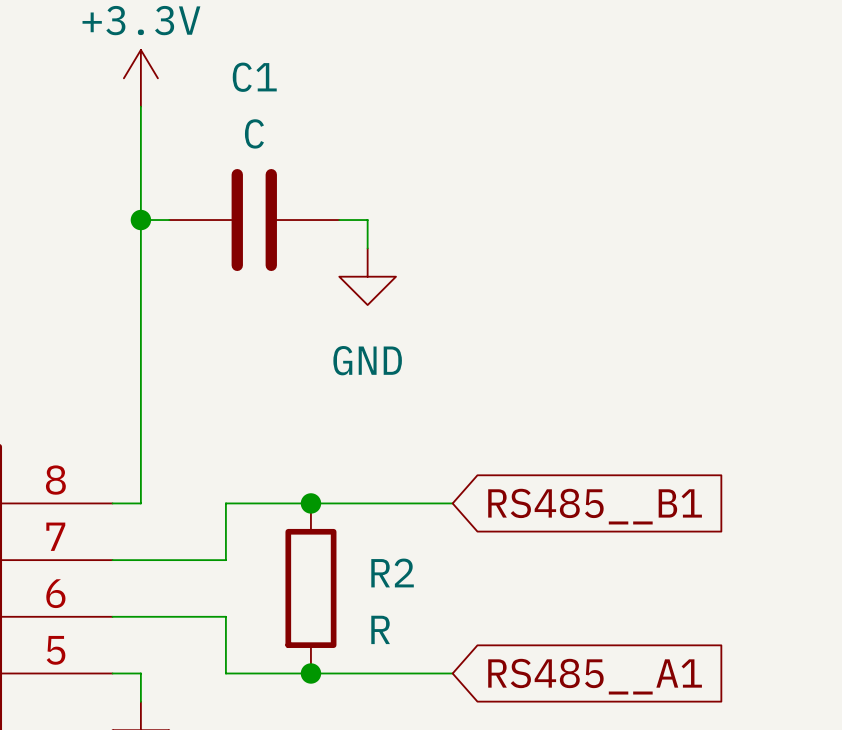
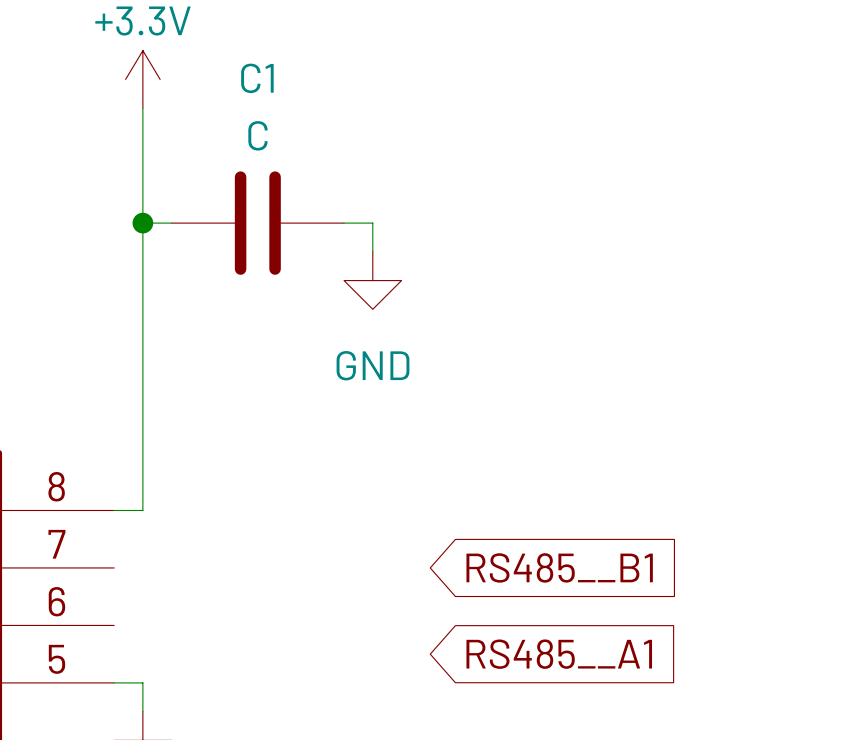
junction: (310, 503) -> none
wire: (452, 503) (225, 503) (225, 560) (112, 560) -> none
global label position: RS485__B1 (595, 506) -> RS485__B1 (559, 567)
R2: R (310, 588) -> none
wire: (112, 616) (225, 616) (225, 673) (452, 673) -> none
junction: (310, 673) -> none
global label position: RS485__A1 (595, 676) -> RS485__A1 (559, 654)

